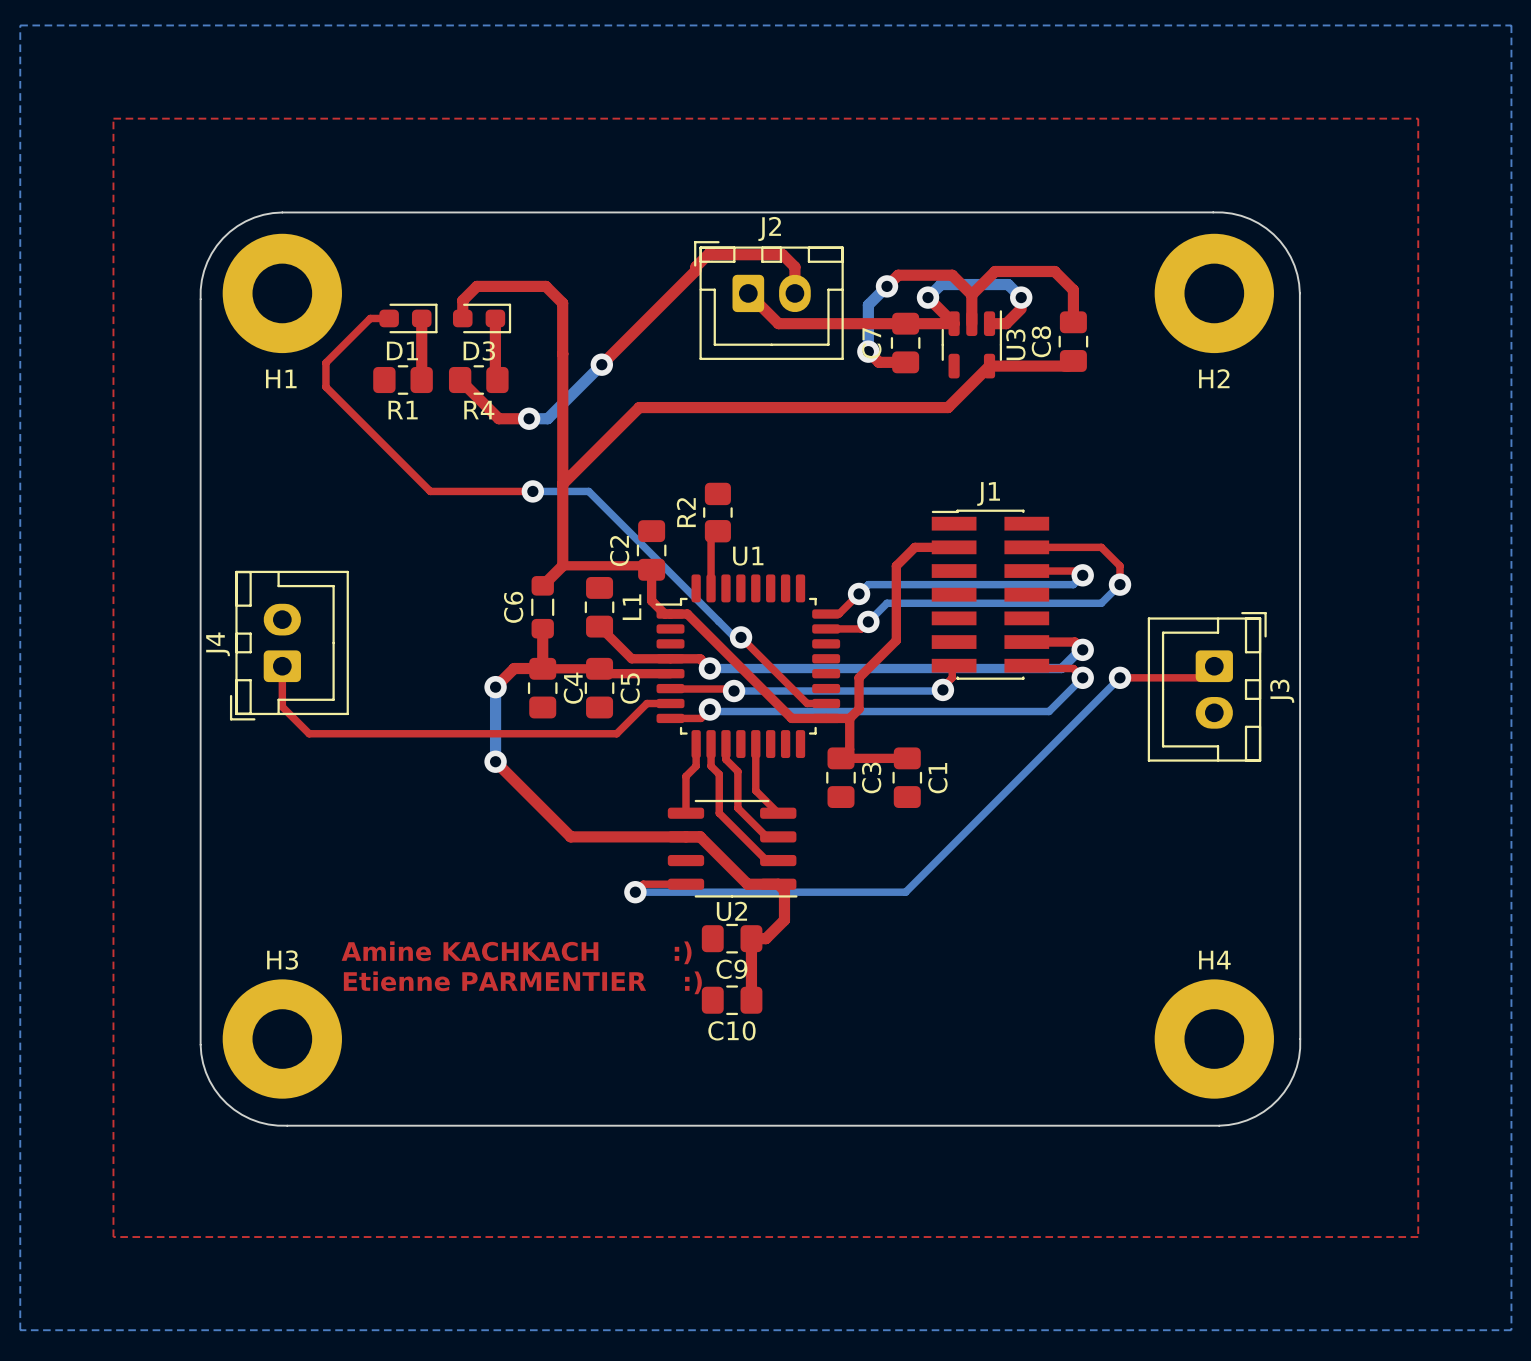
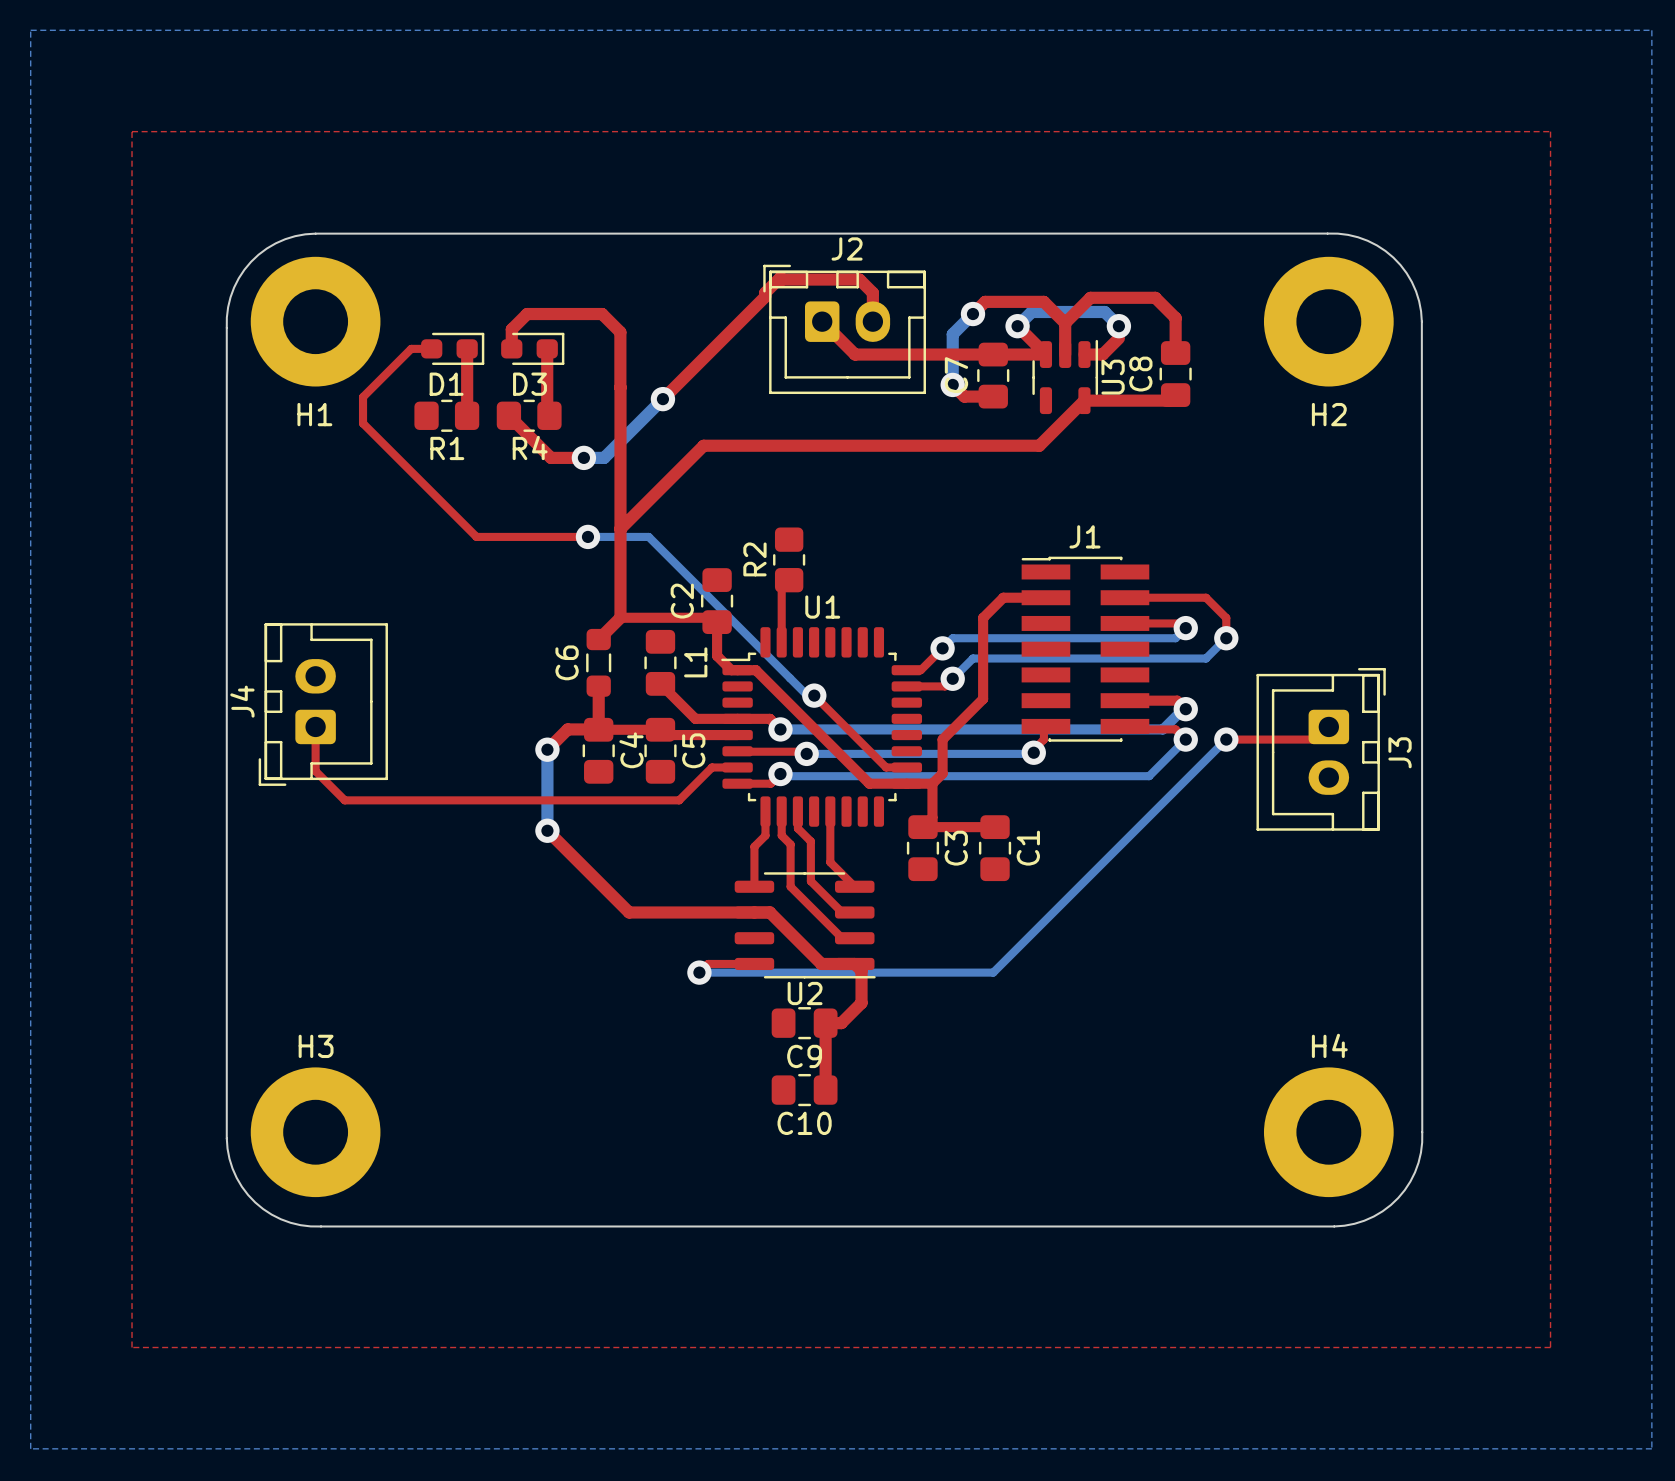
text: Amine KACHKACH :) (516, 952) -> none
text: Etienne PARMENTIER :) (522, 982) -> none

